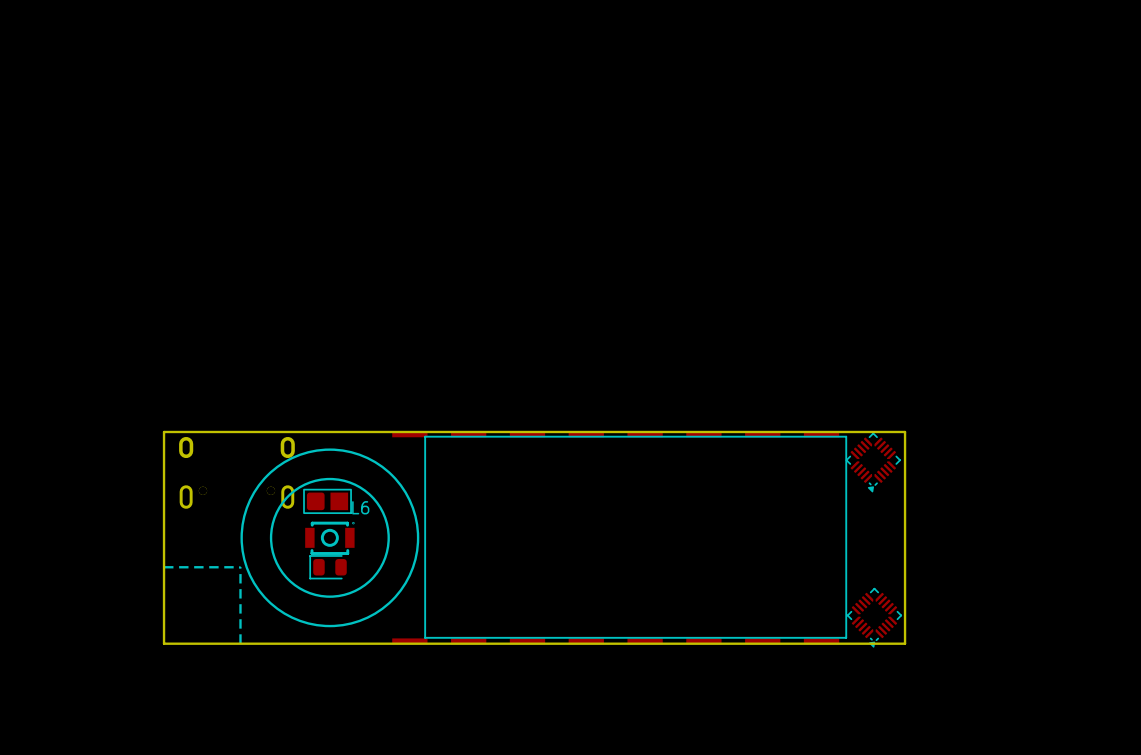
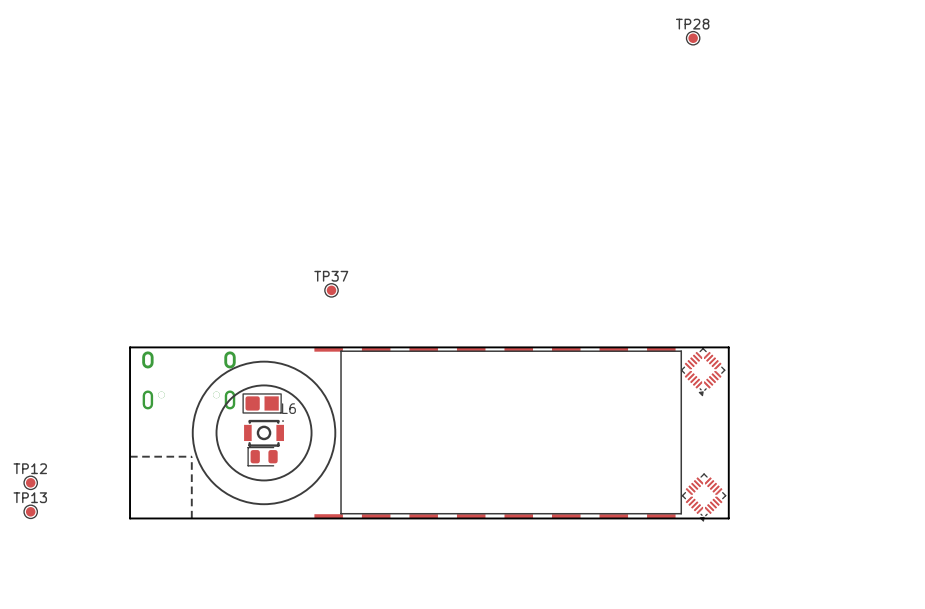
TP28: none -> (693, 38)
TP37: none -> (331, 290)
TP12: none -> (30, 482)
TP13: none -> (30, 511)

